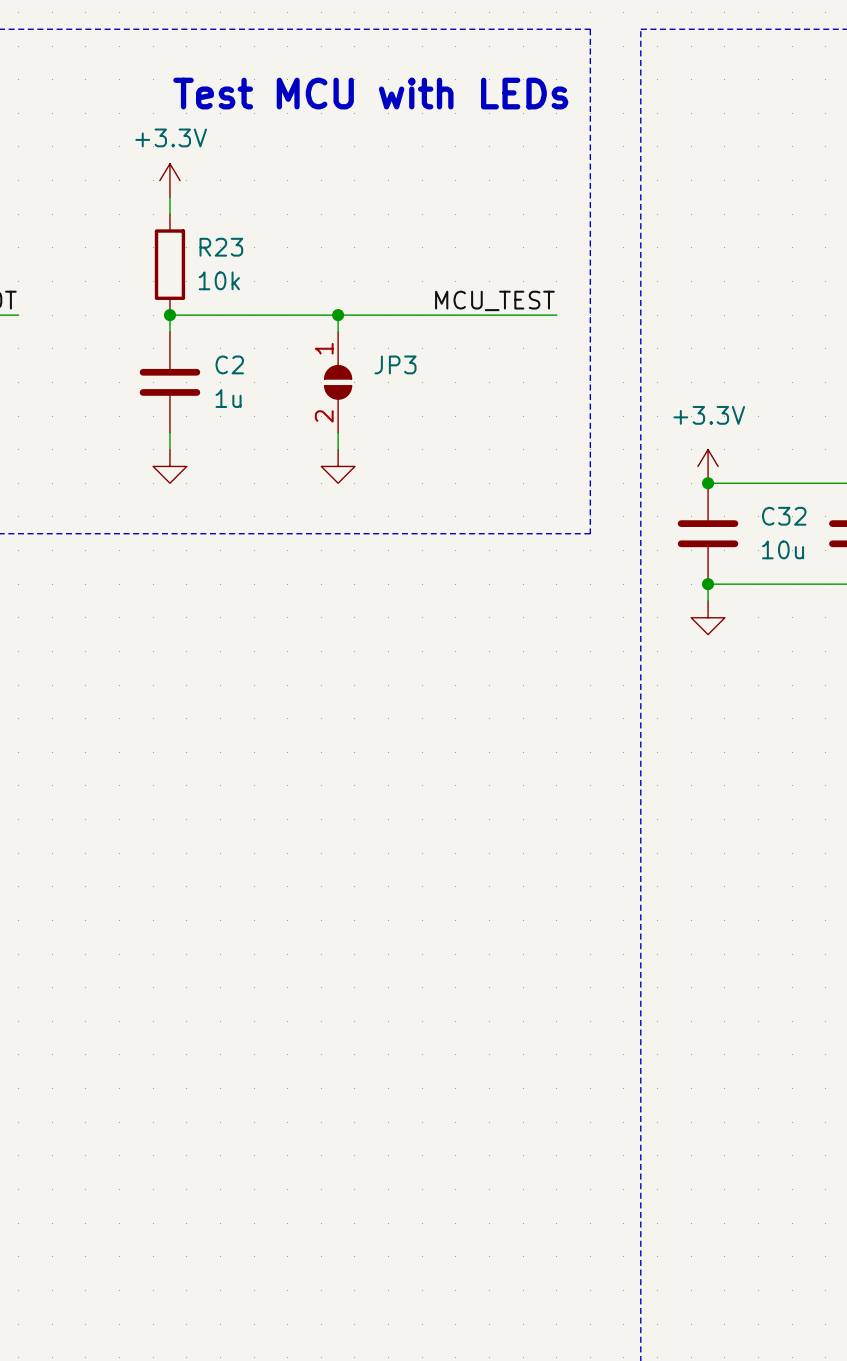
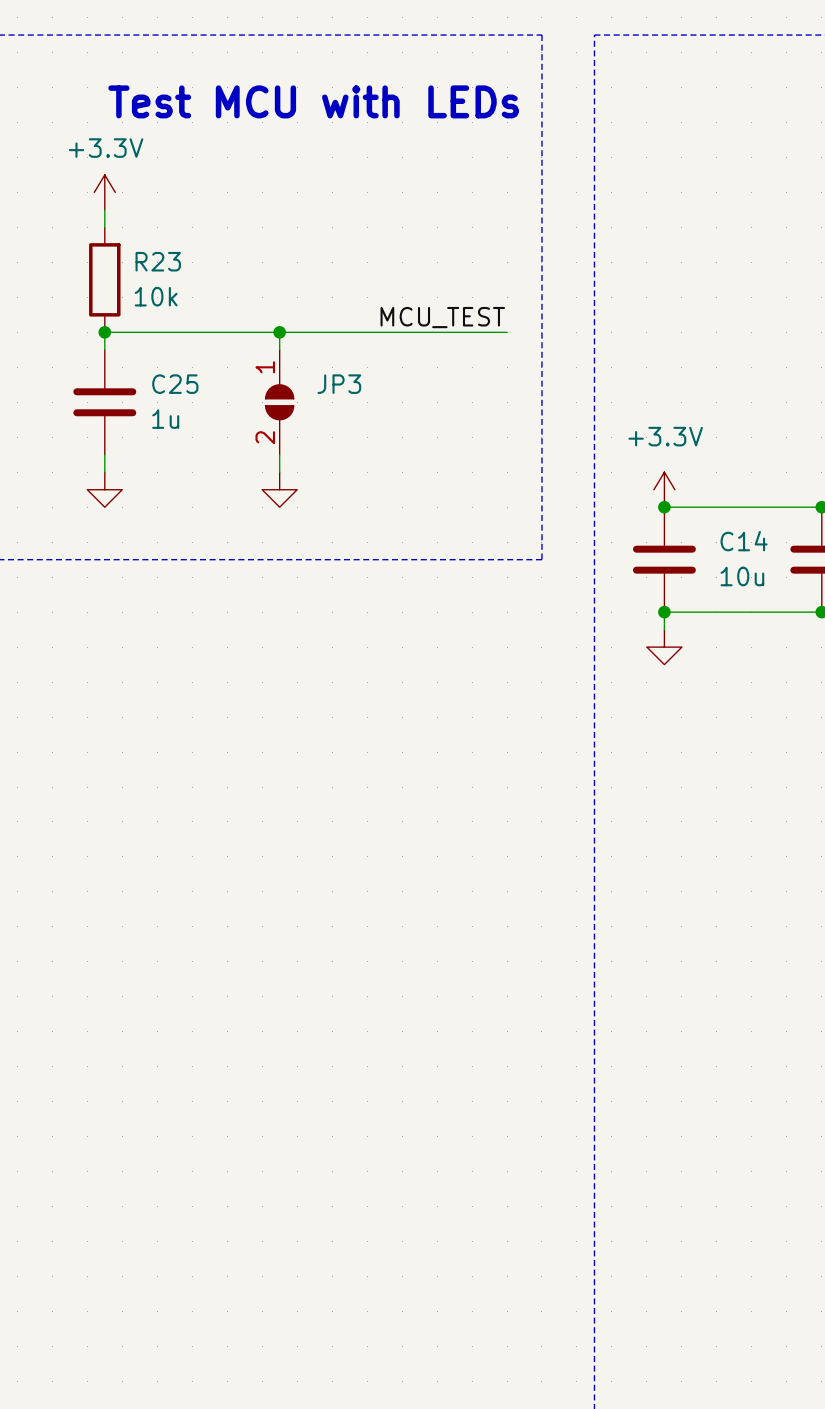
C2 name: C2 (229, 364) -> C25 (175, 384)
C32 name: C32 (784, 516) -> C14 (744, 541)

